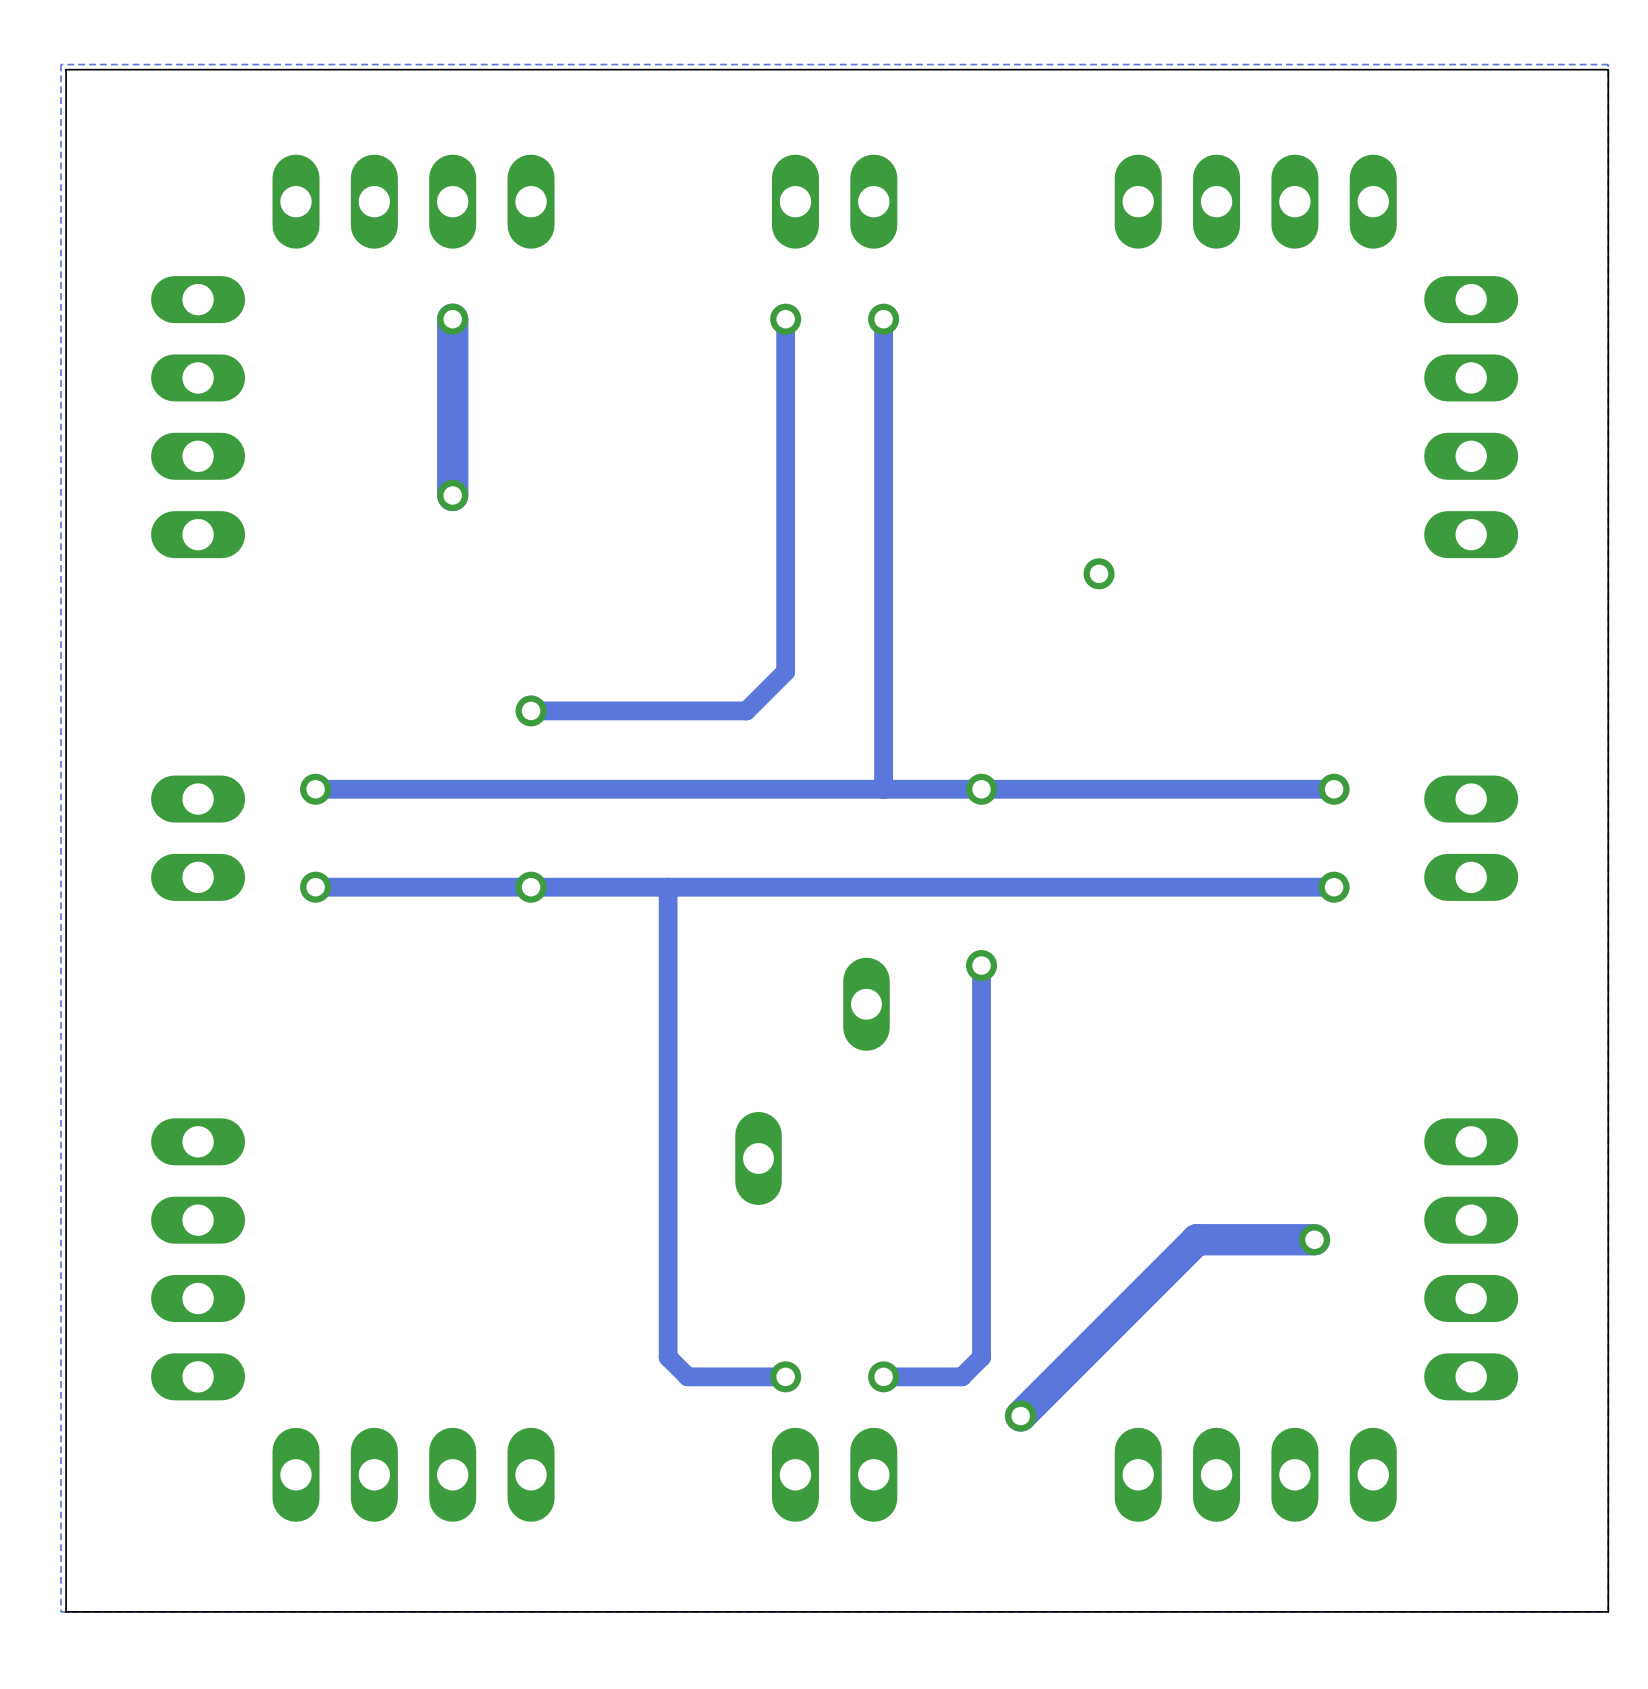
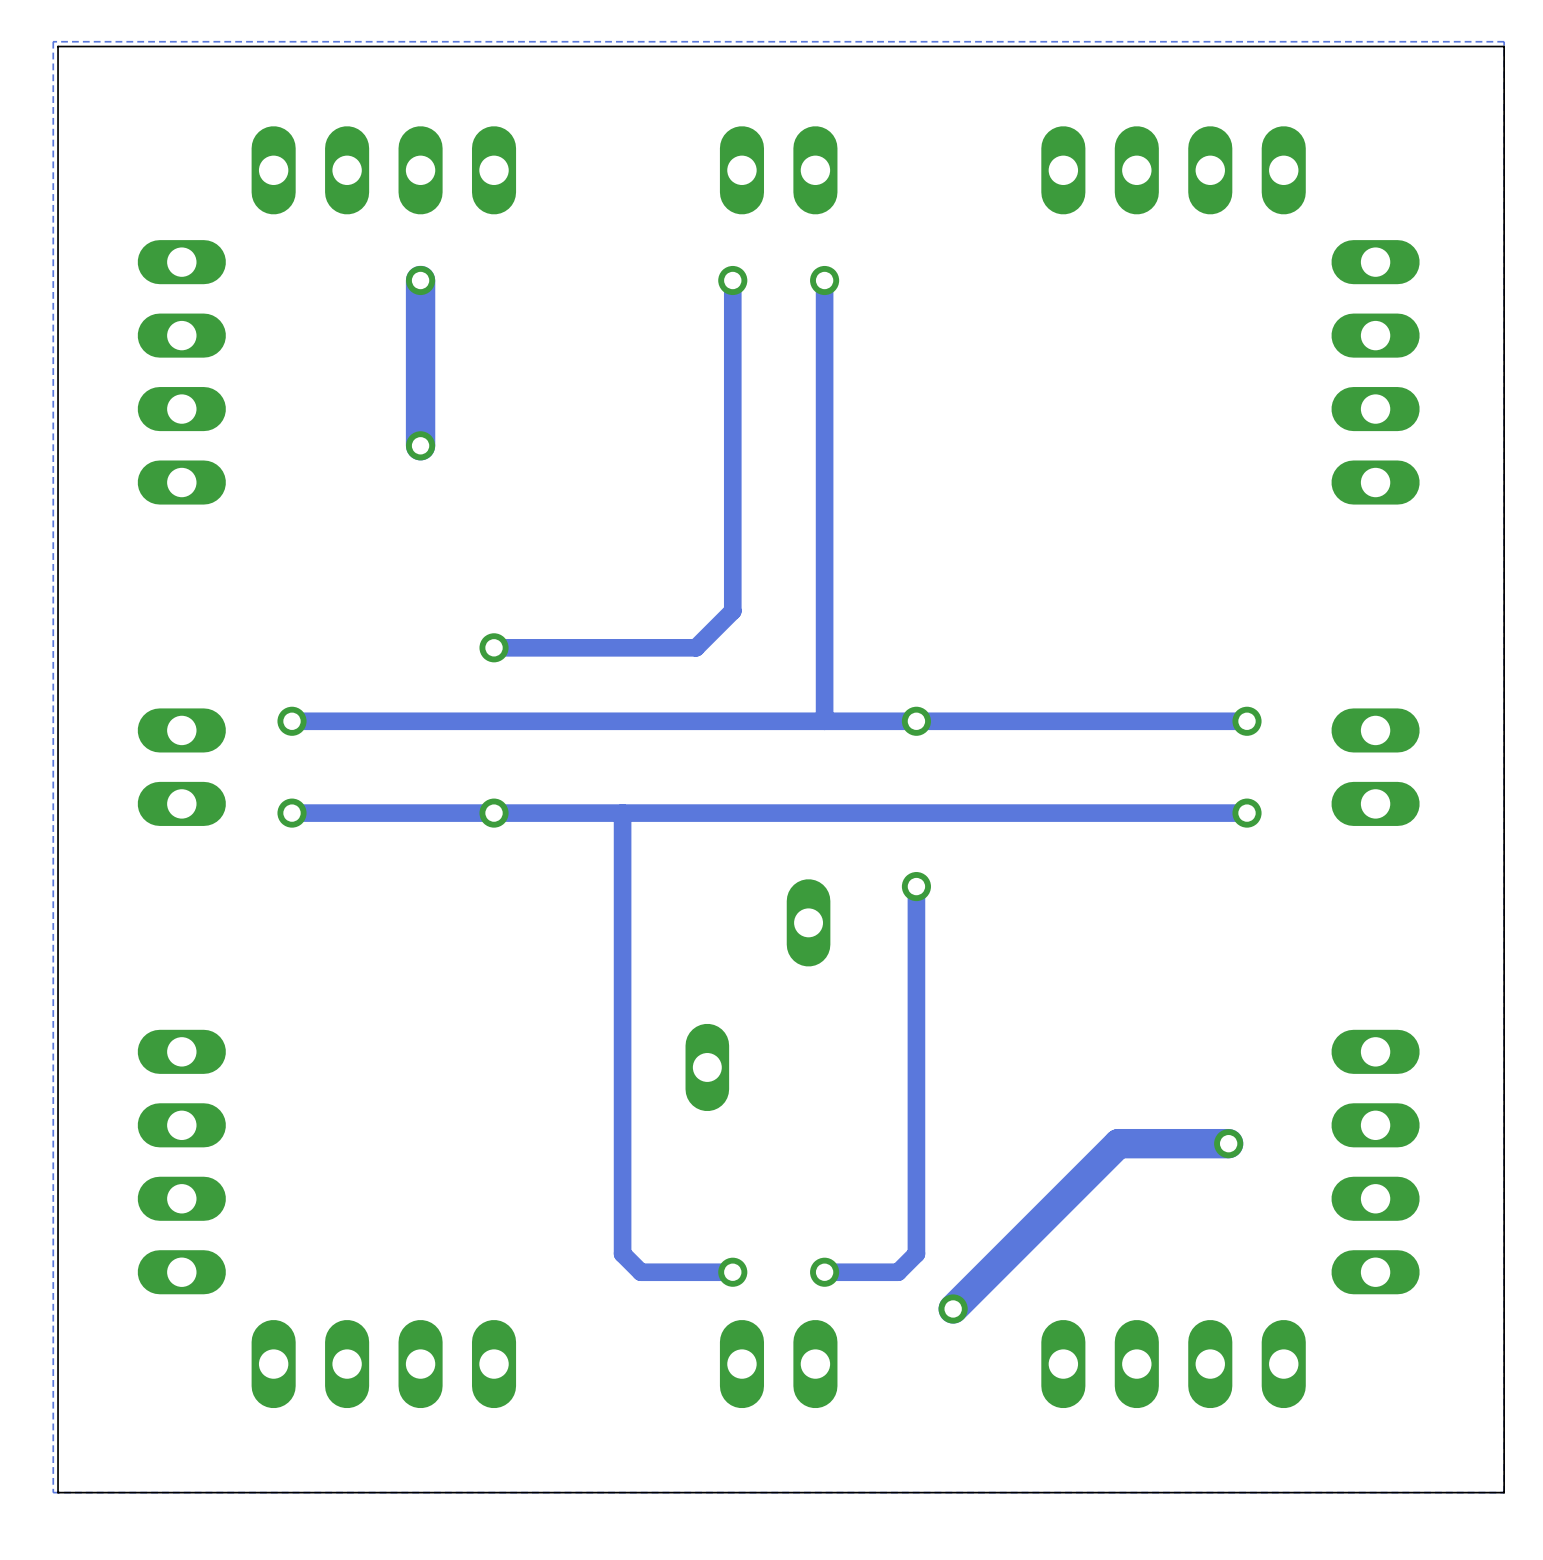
via: (1099, 573) -> none

